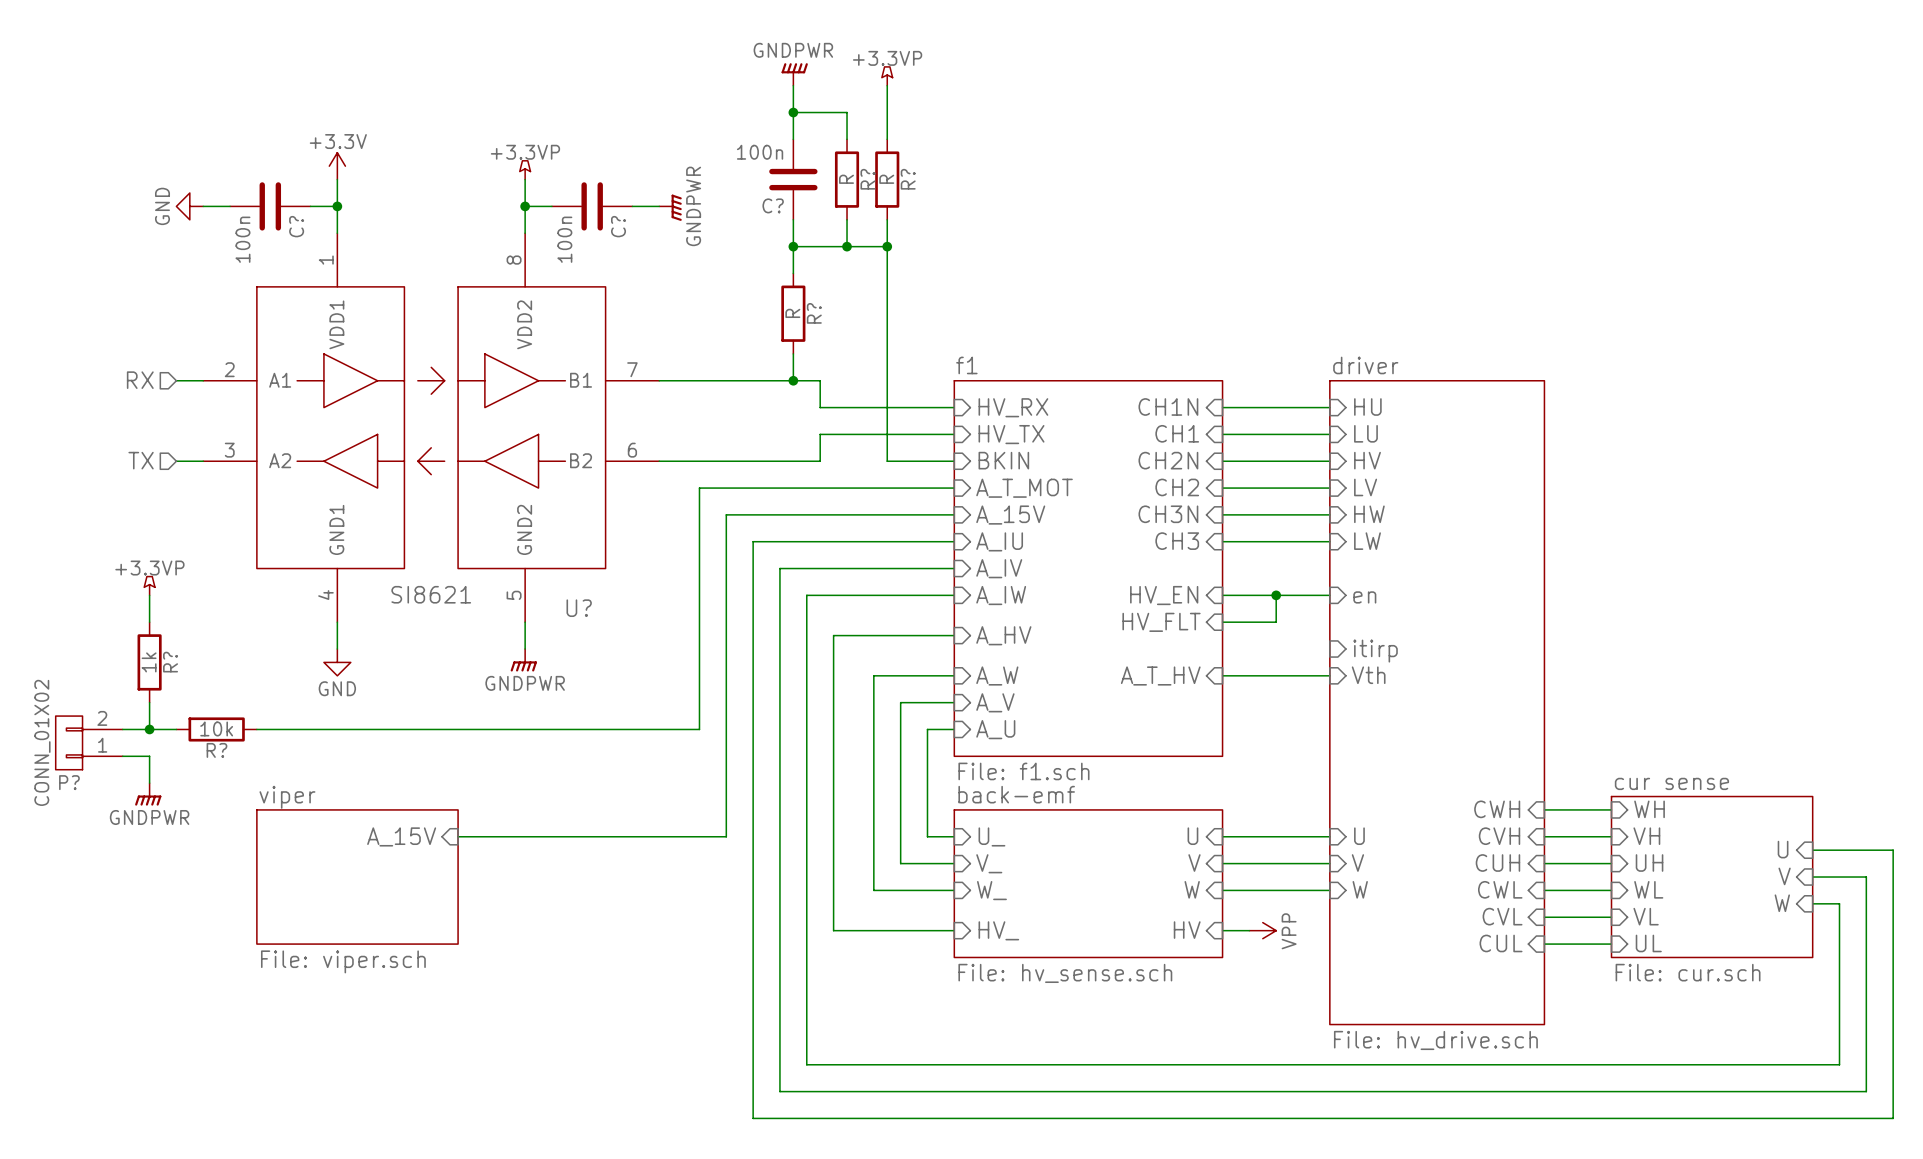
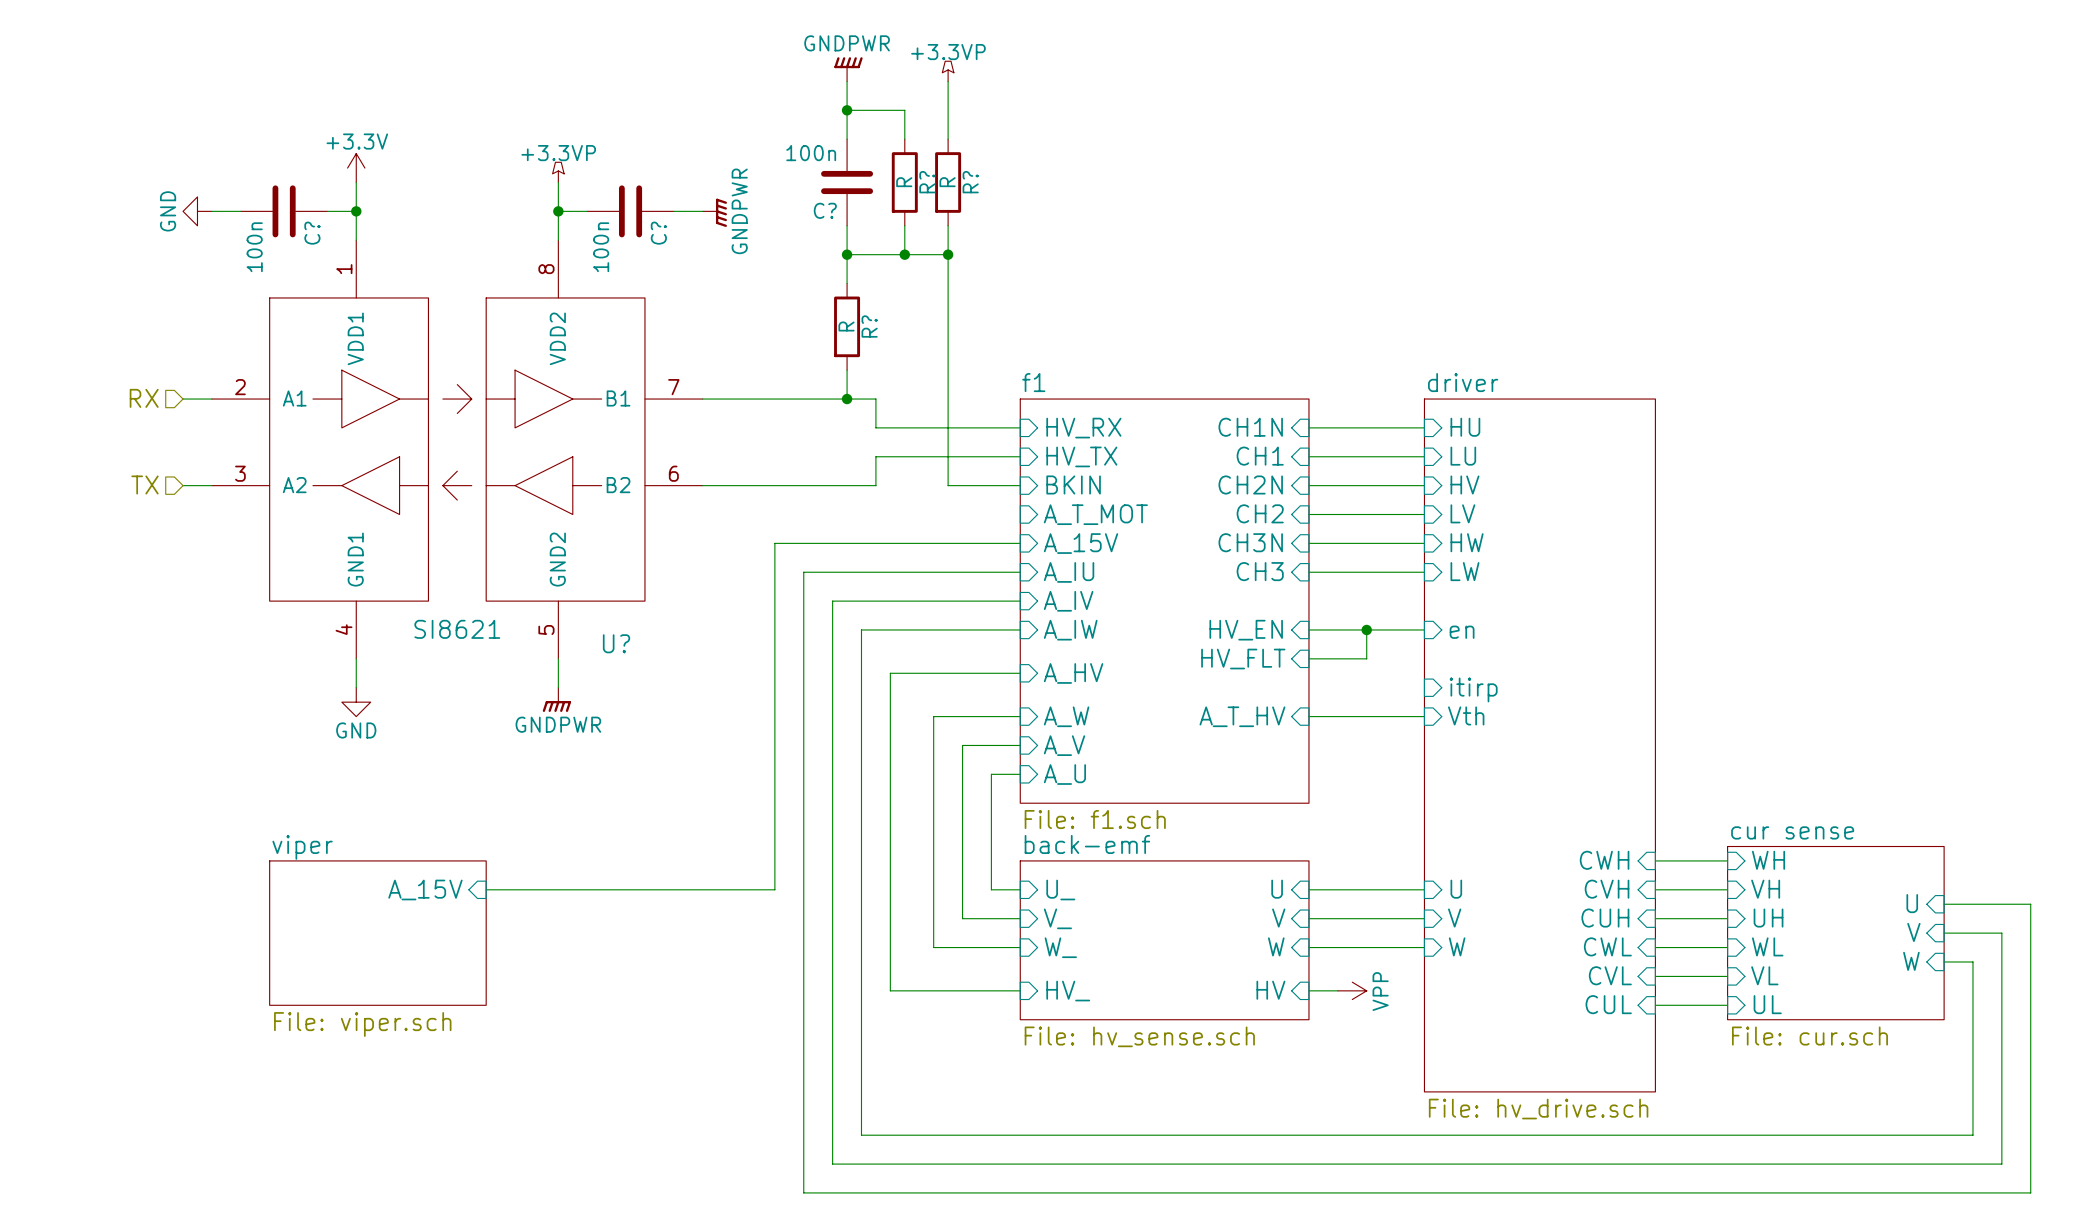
wire: (954, 488) (699, 488) (699, 729) (256, 729) -> none
power symbol: +3.3VP (149, 585) -> none
wire: (149, 595) (149, 622) -> none
R?: 1k (149, 662) -> none
wire: (149, 702) (149, 729) -> none
wire: (122, 729) (176, 729) -> none
junction: (149, 729) -> none
R?: 10k (216, 729) -> none
P?: CONN_01X02 (89, 742) -> none
wire: (122, 756) (149, 756) (149, 783) -> none
power symbol: GNDPWR (148, 794) -> none

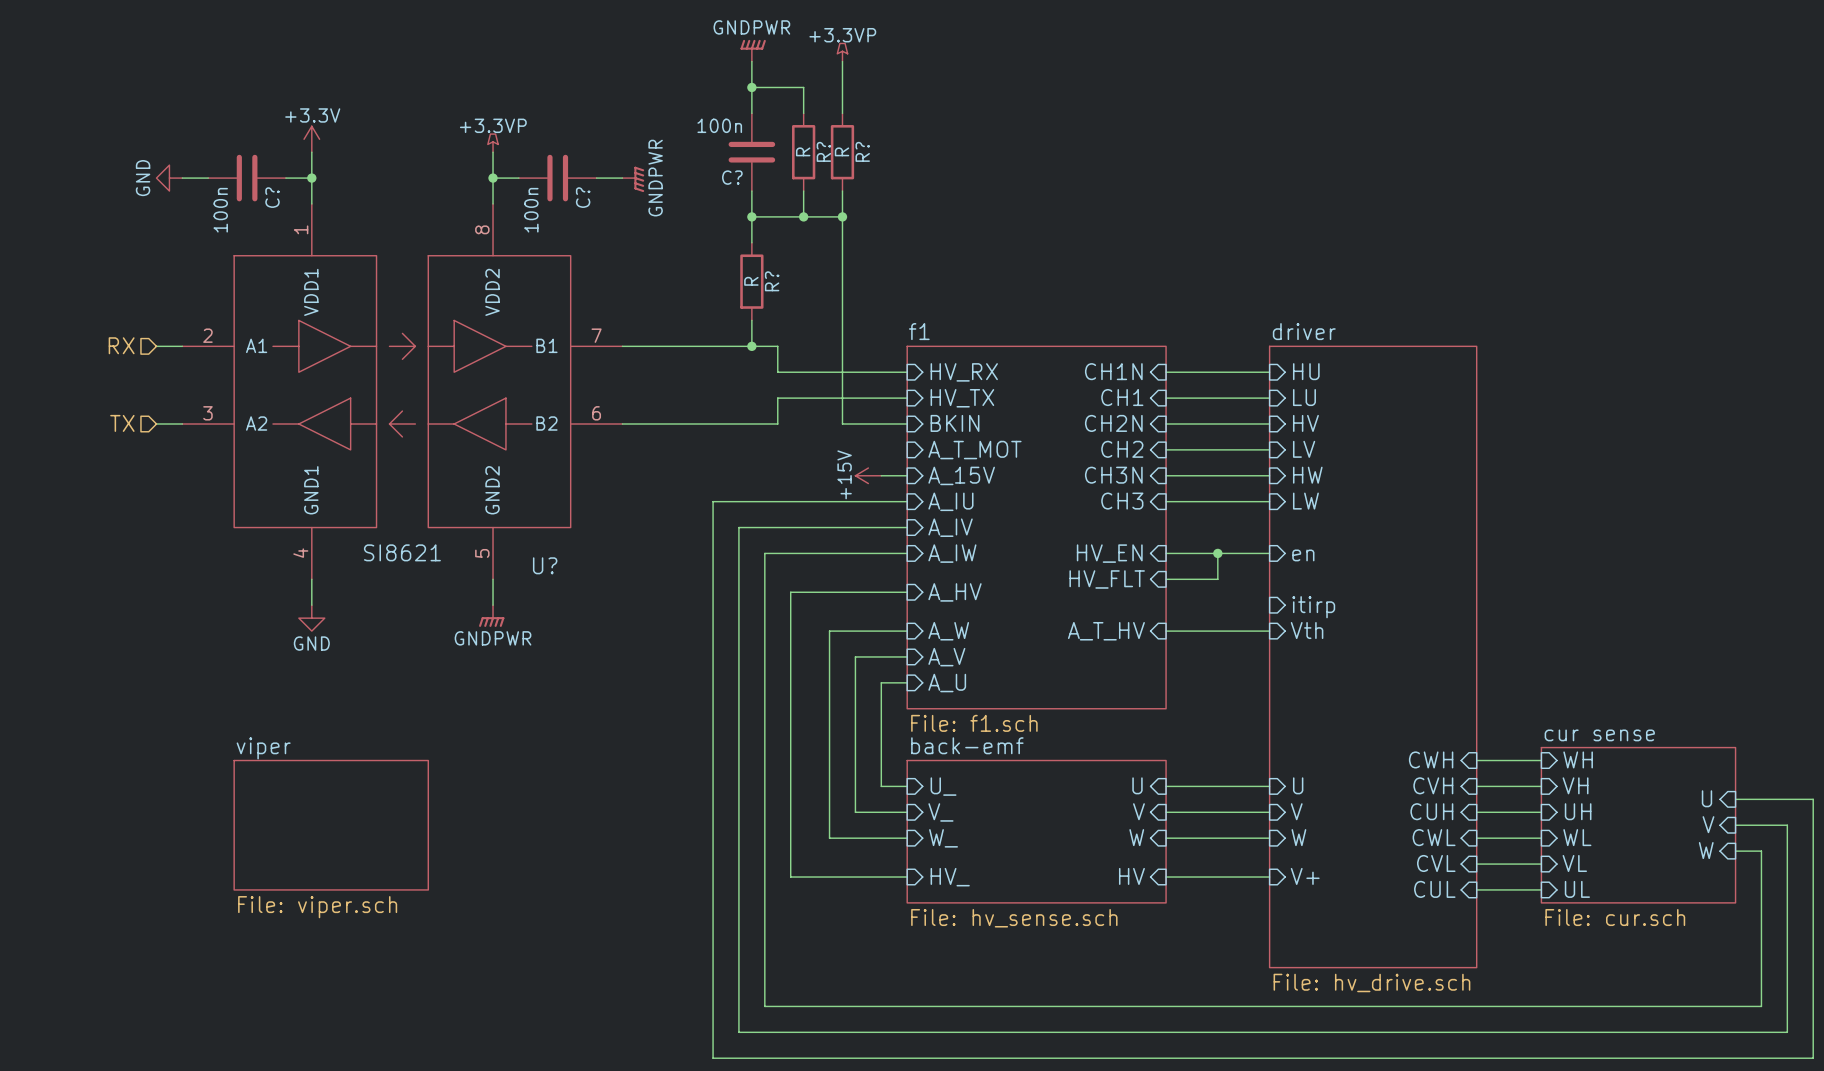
power symbol: none -> +15V (868, 475)
wire: (991, 543) (774, 543) (774, 889) (486, 889) -> none
sheet pin: A_15V (425, 889) -> none
wire: none -> (1191, 877) (1269, 877)
power symbol: VPP (1352, 990) -> none
sheet pin: none -> V+ (1305, 876)

